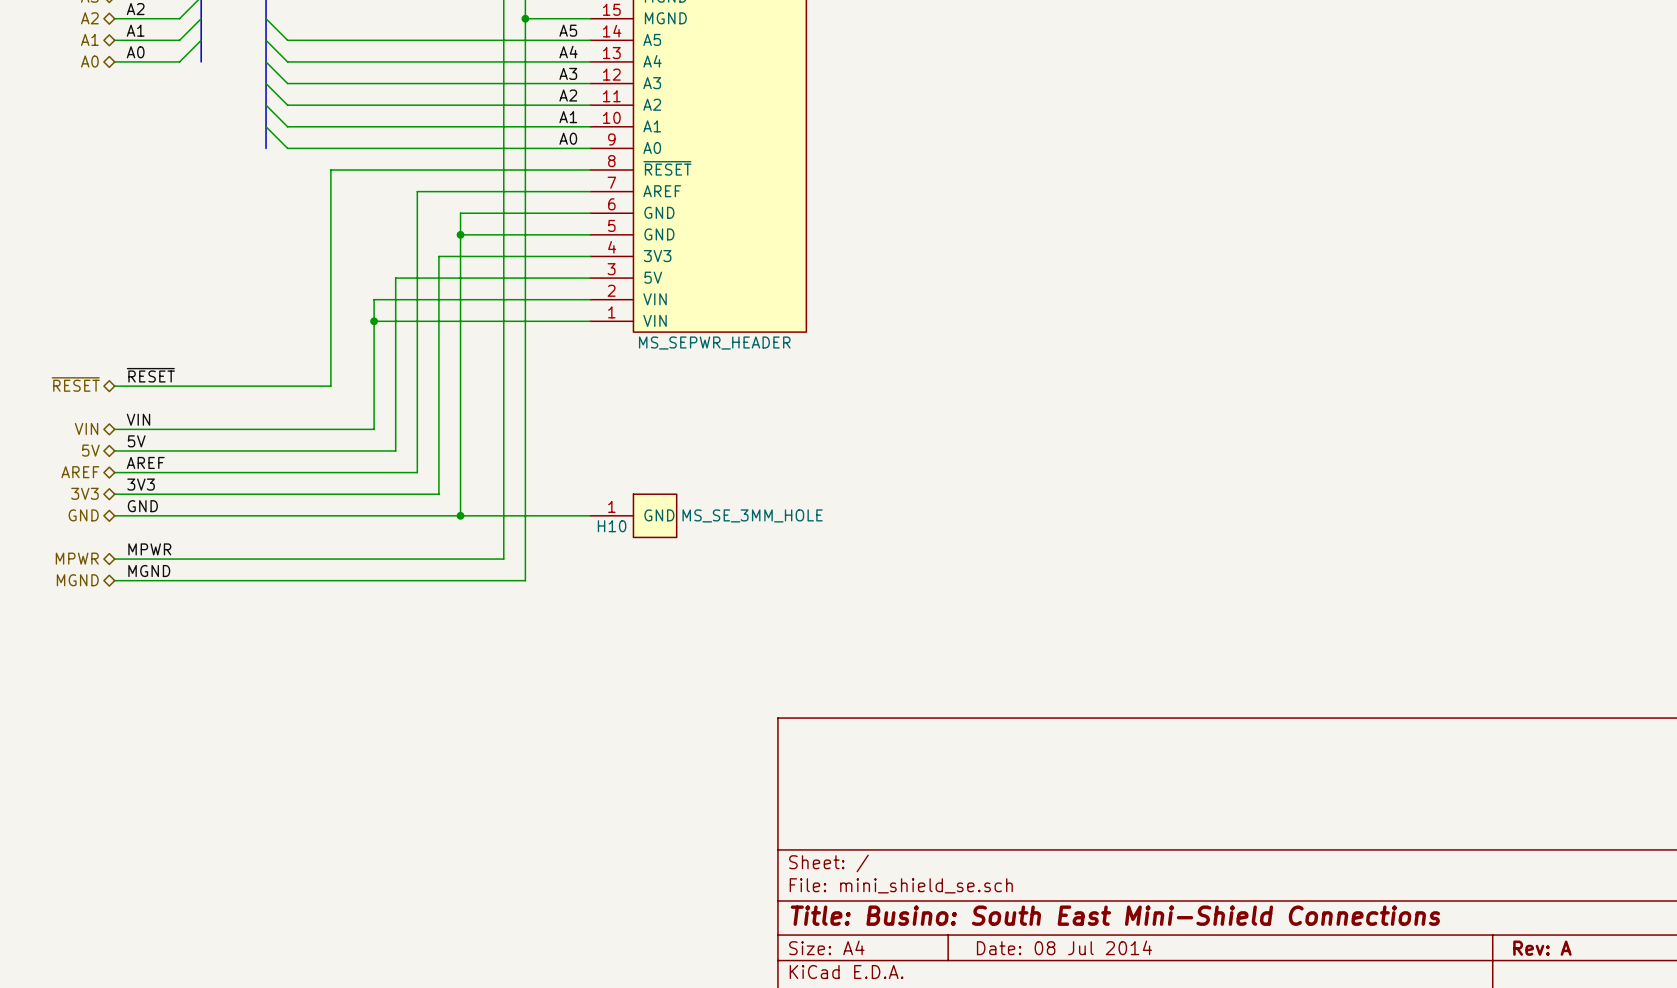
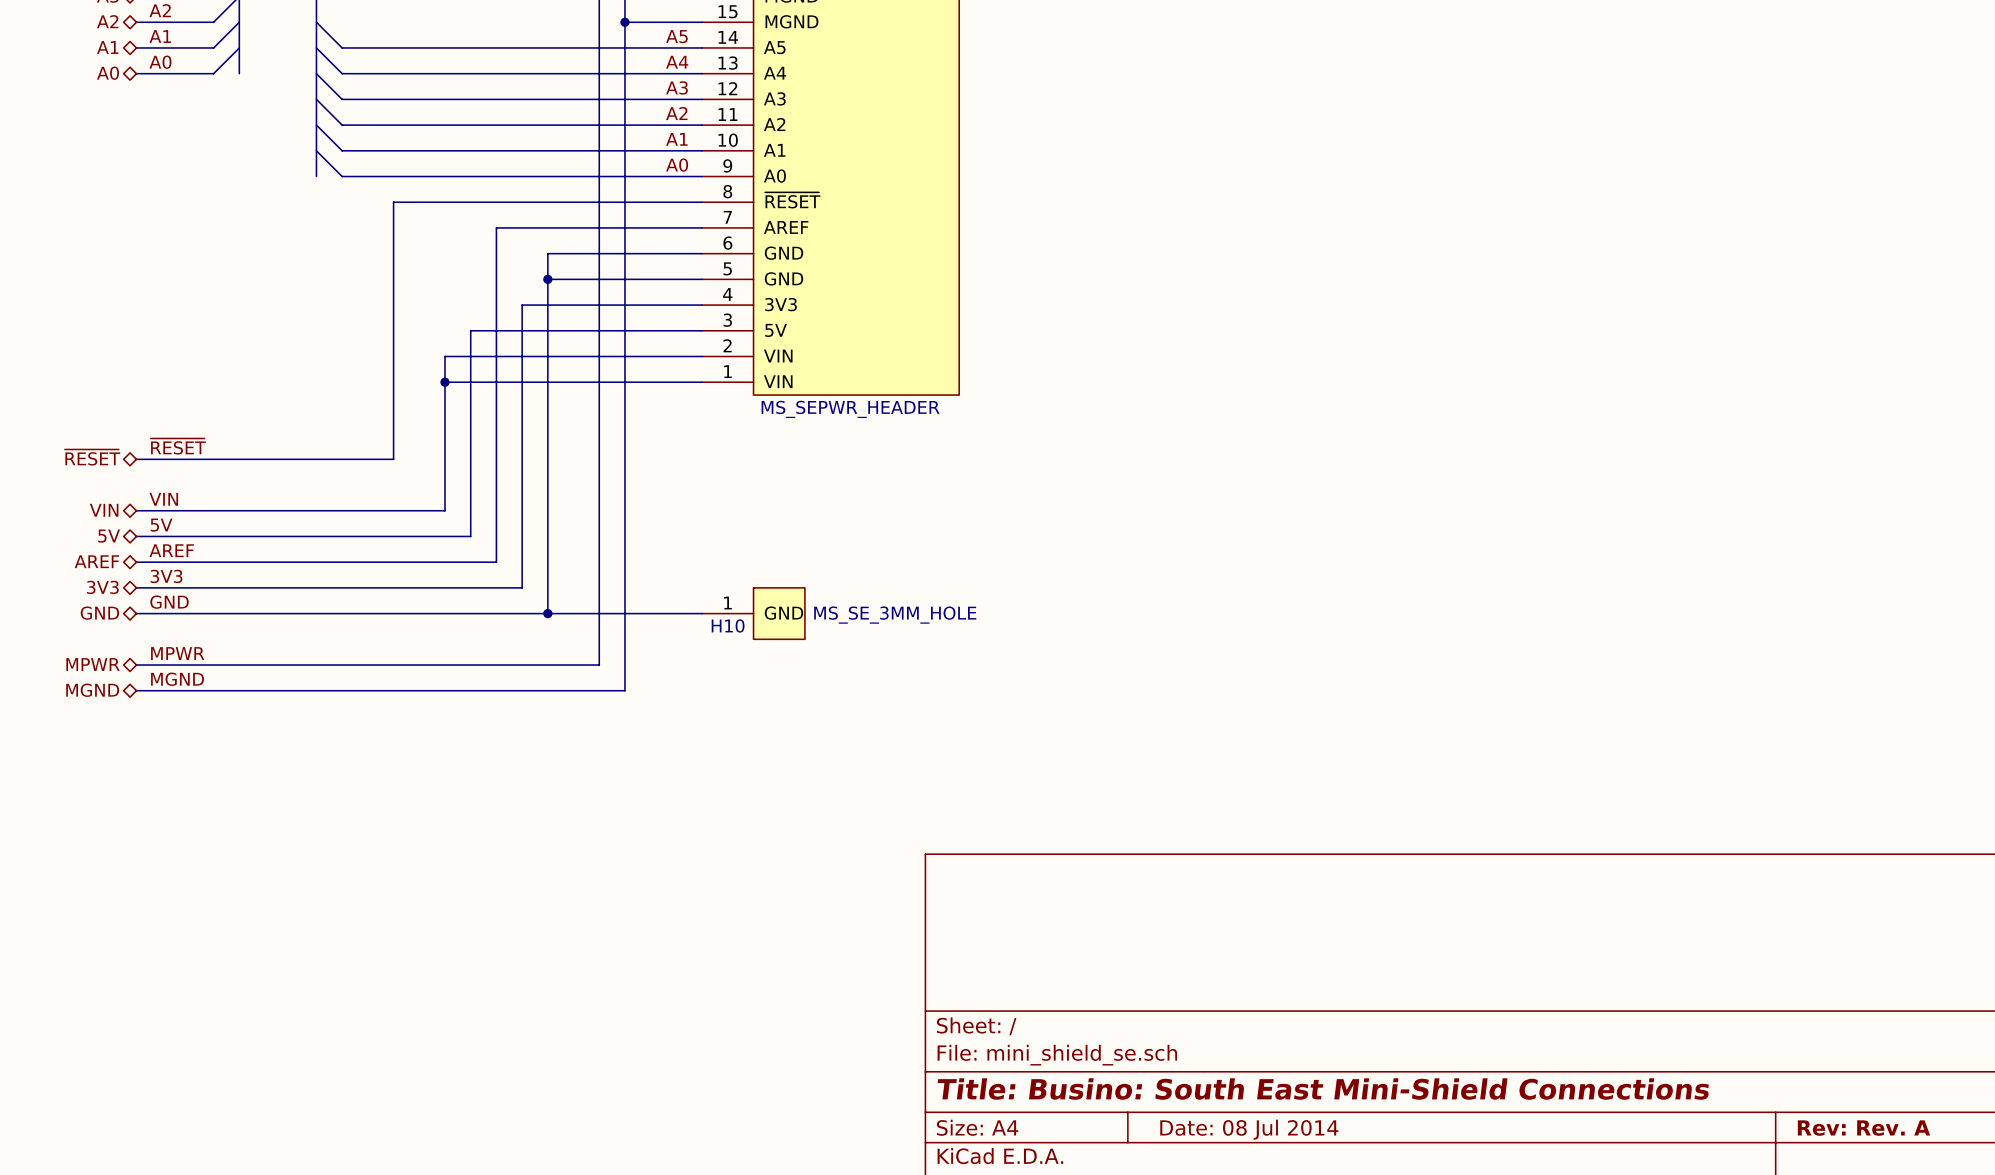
title block: Rev: A (1542, 948) -> Rev: Rev. A (1863, 1128)

